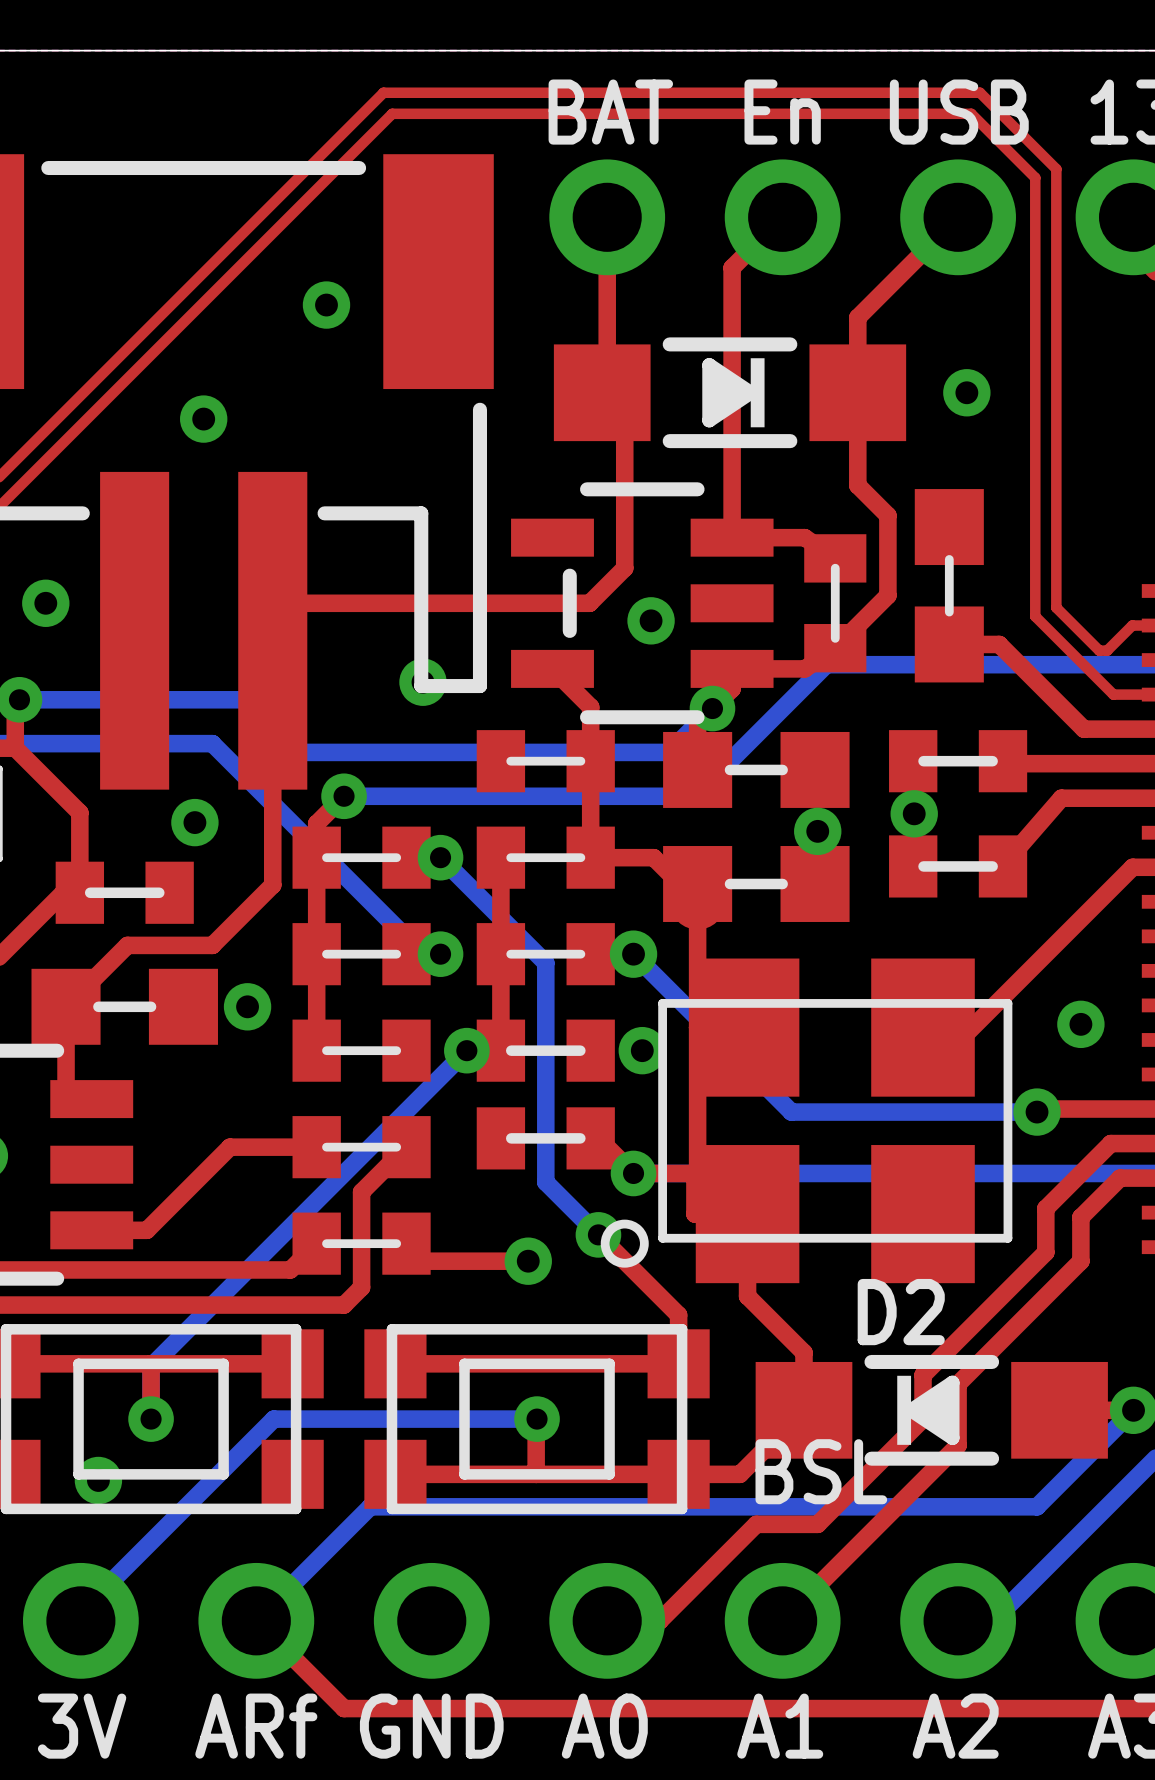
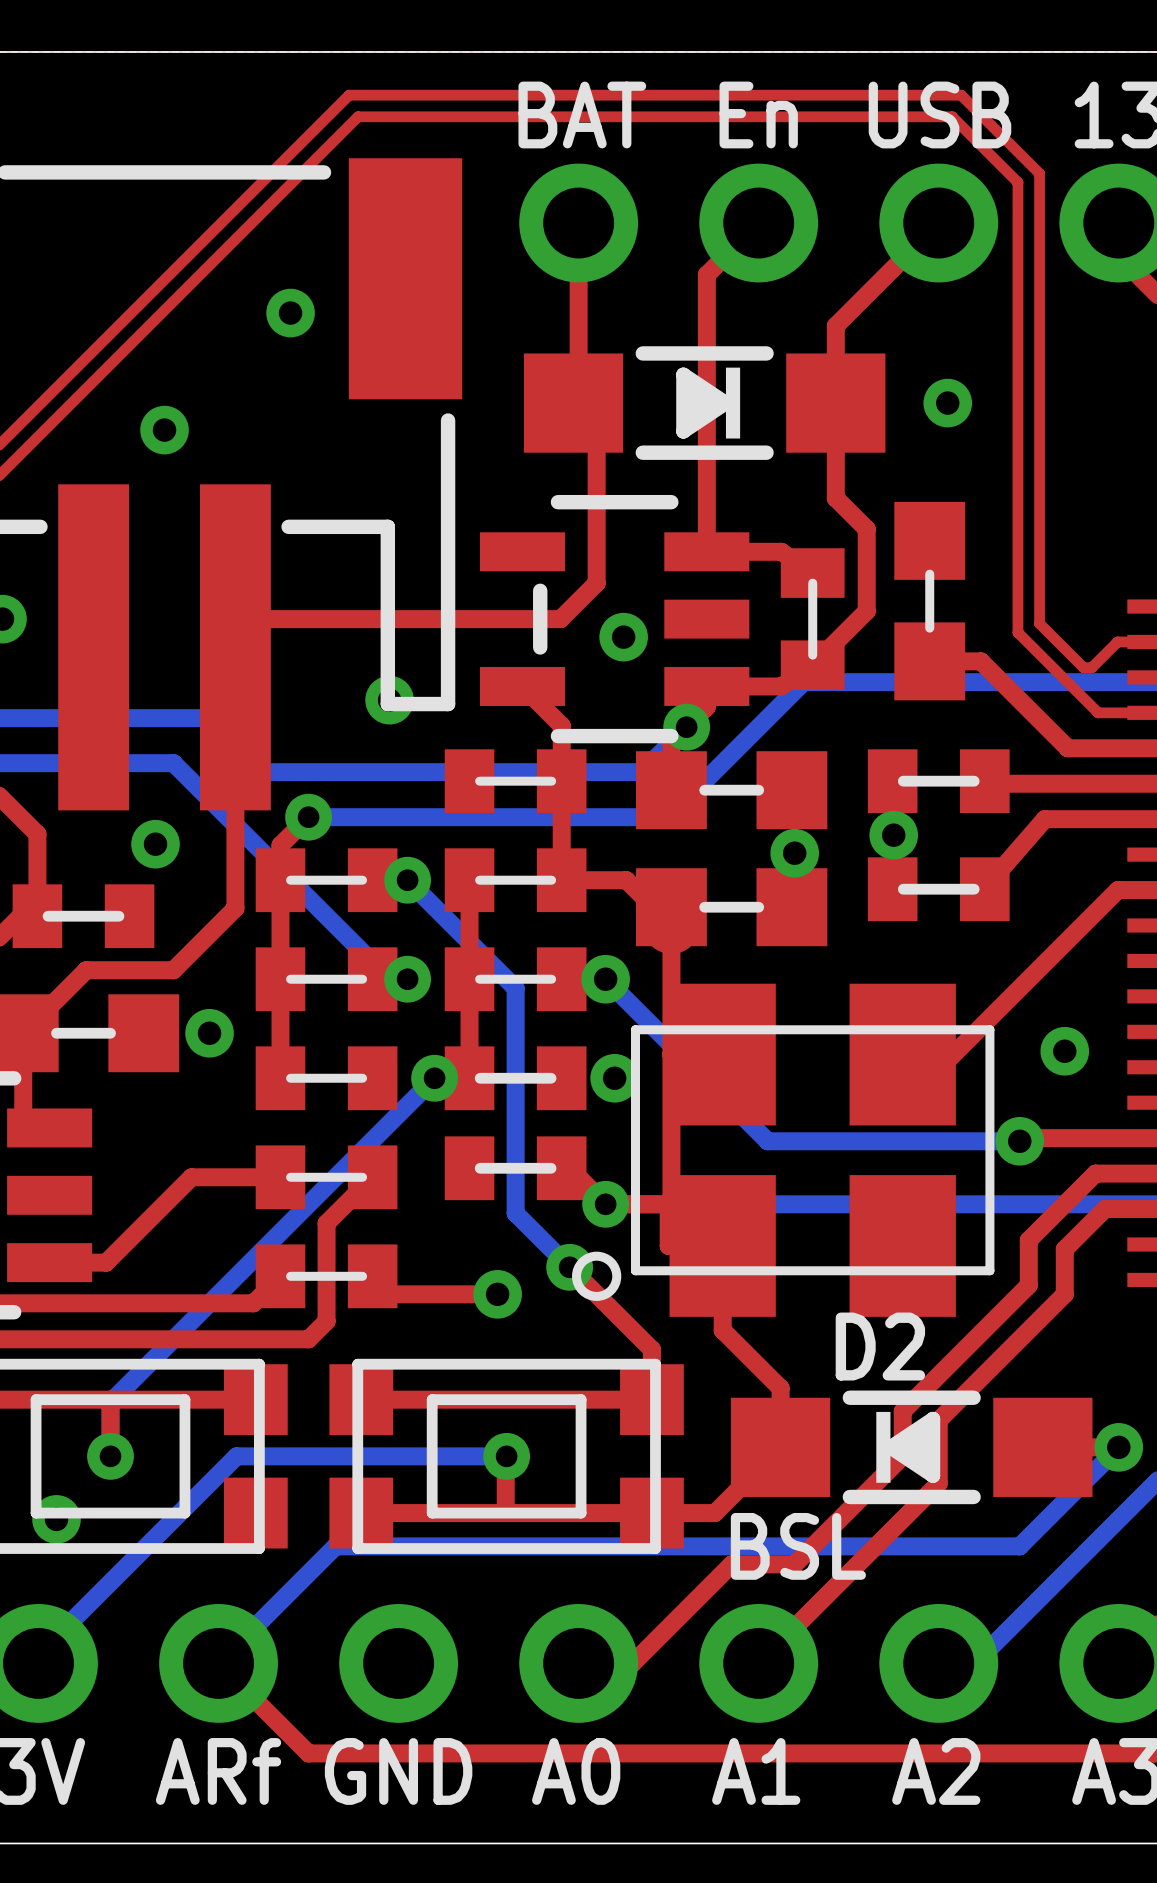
text position: BSL (821, 1471) -> BSL (798, 1546)

